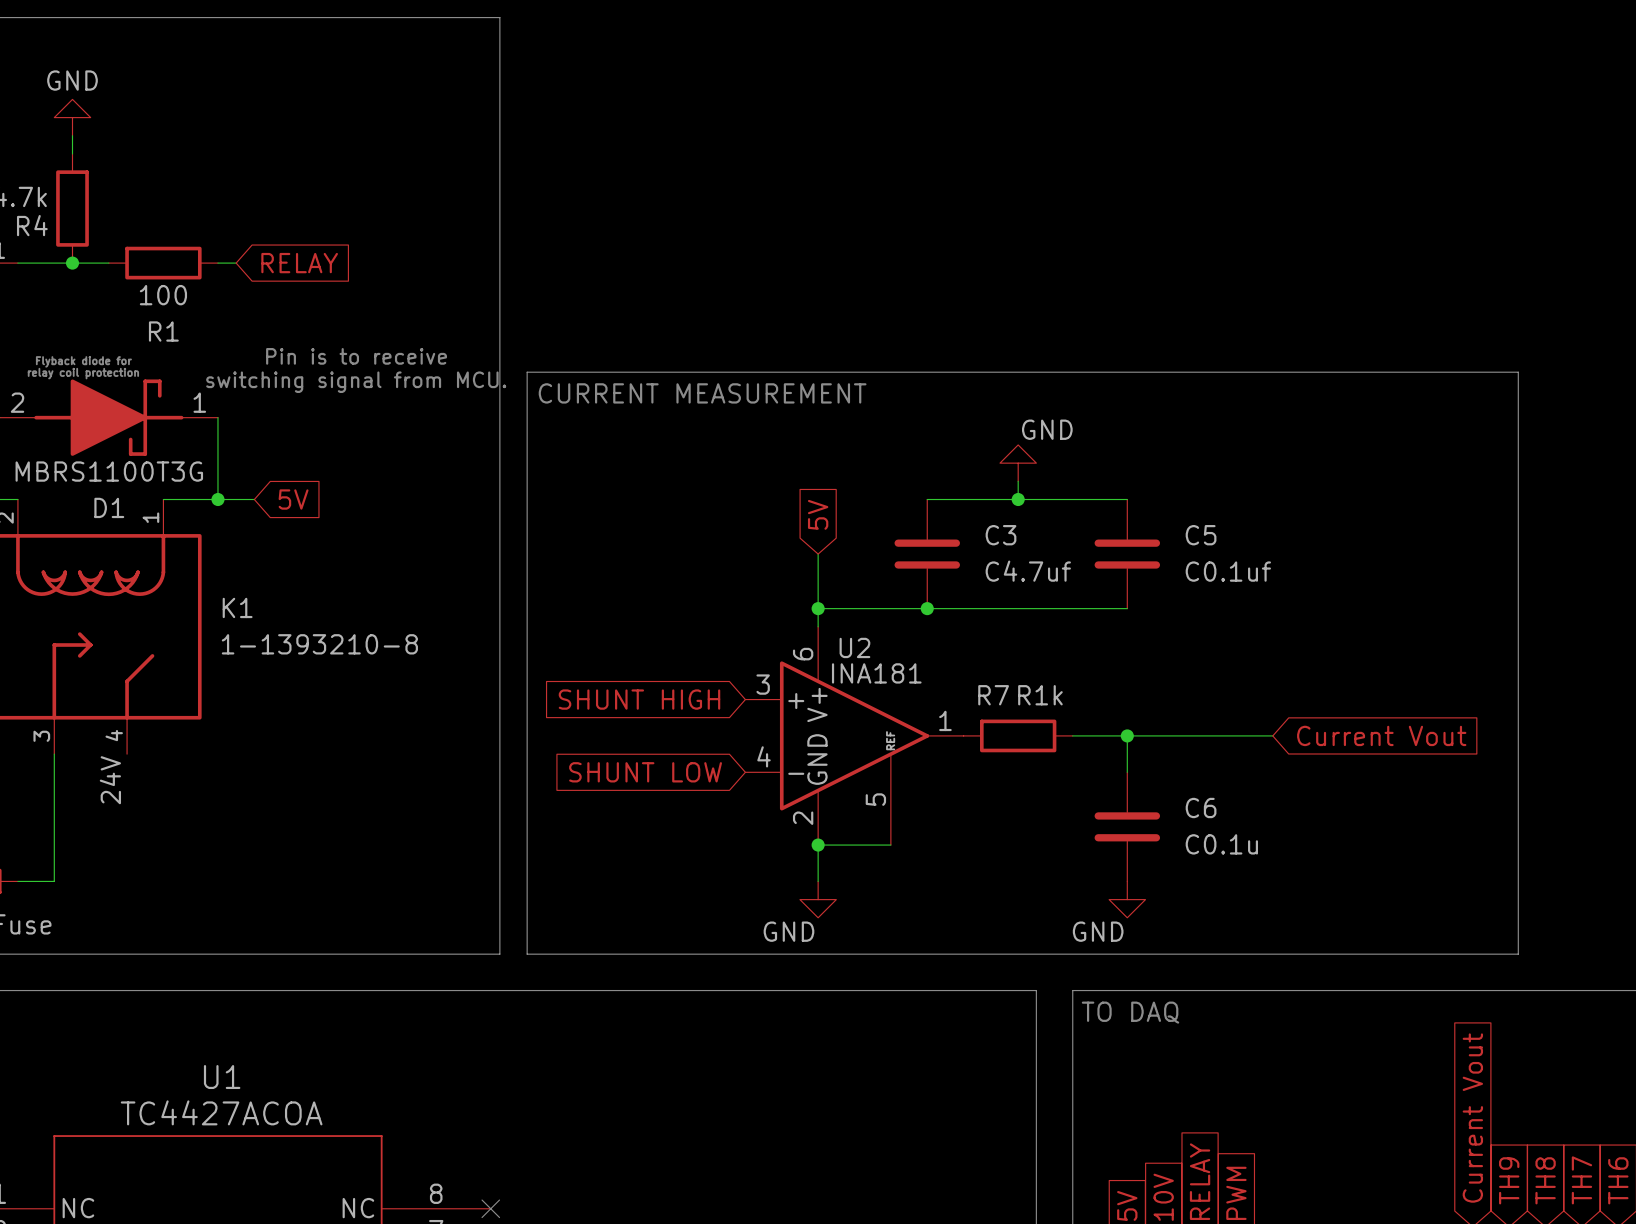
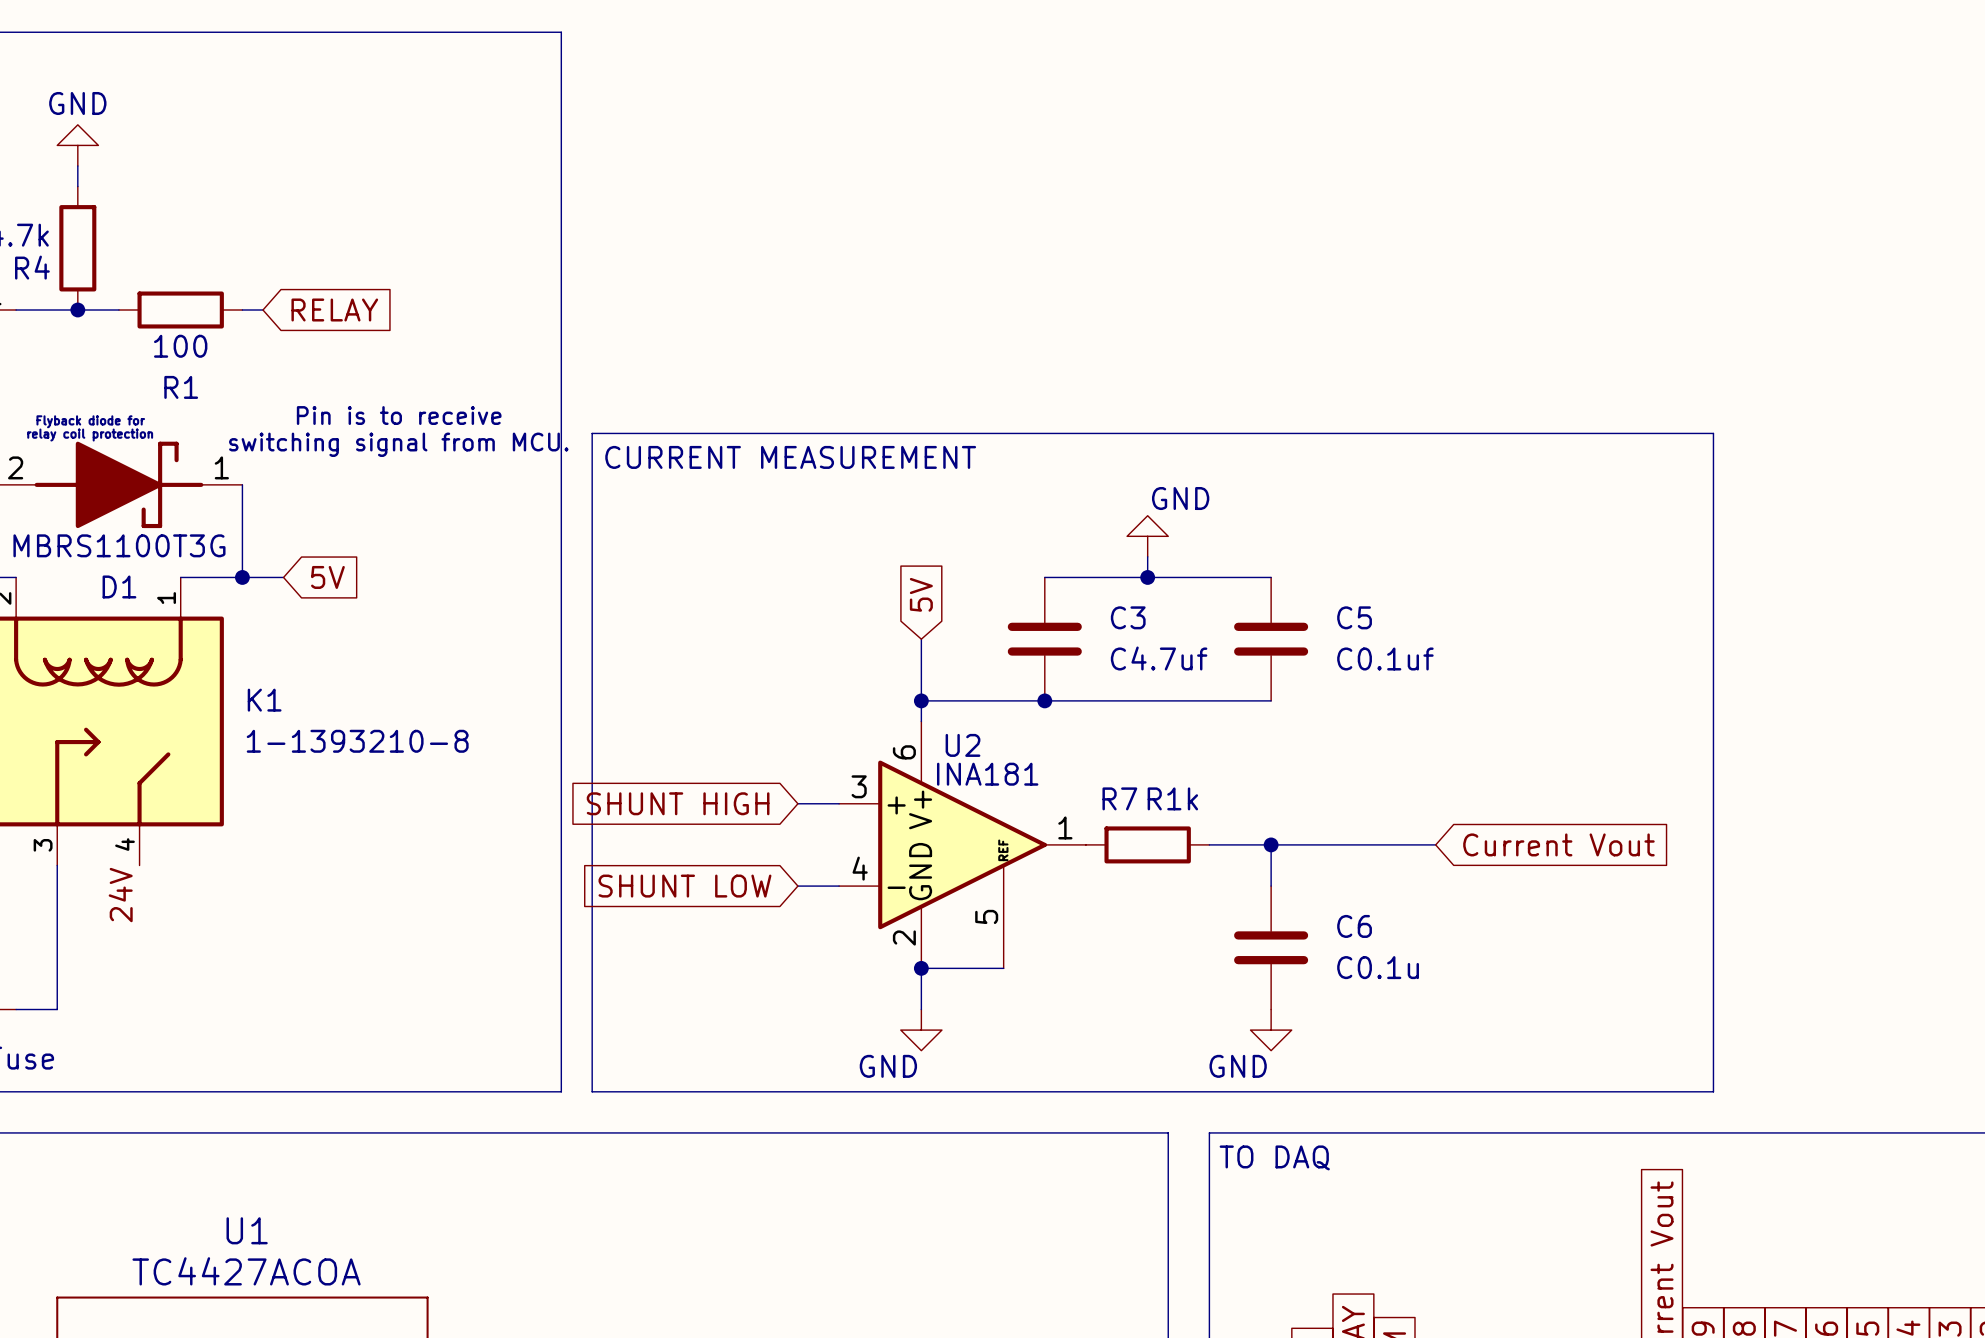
global label position: SHUNT HIGH (639, 699) -> SHUNT HIGH (678, 803)
wire: none -> (797, 803) (839, 803)
global label position: SHUNT LOW (645, 772) -> SHUNT LOW (684, 886)
wire: none -> (797, 886) (839, 886)

